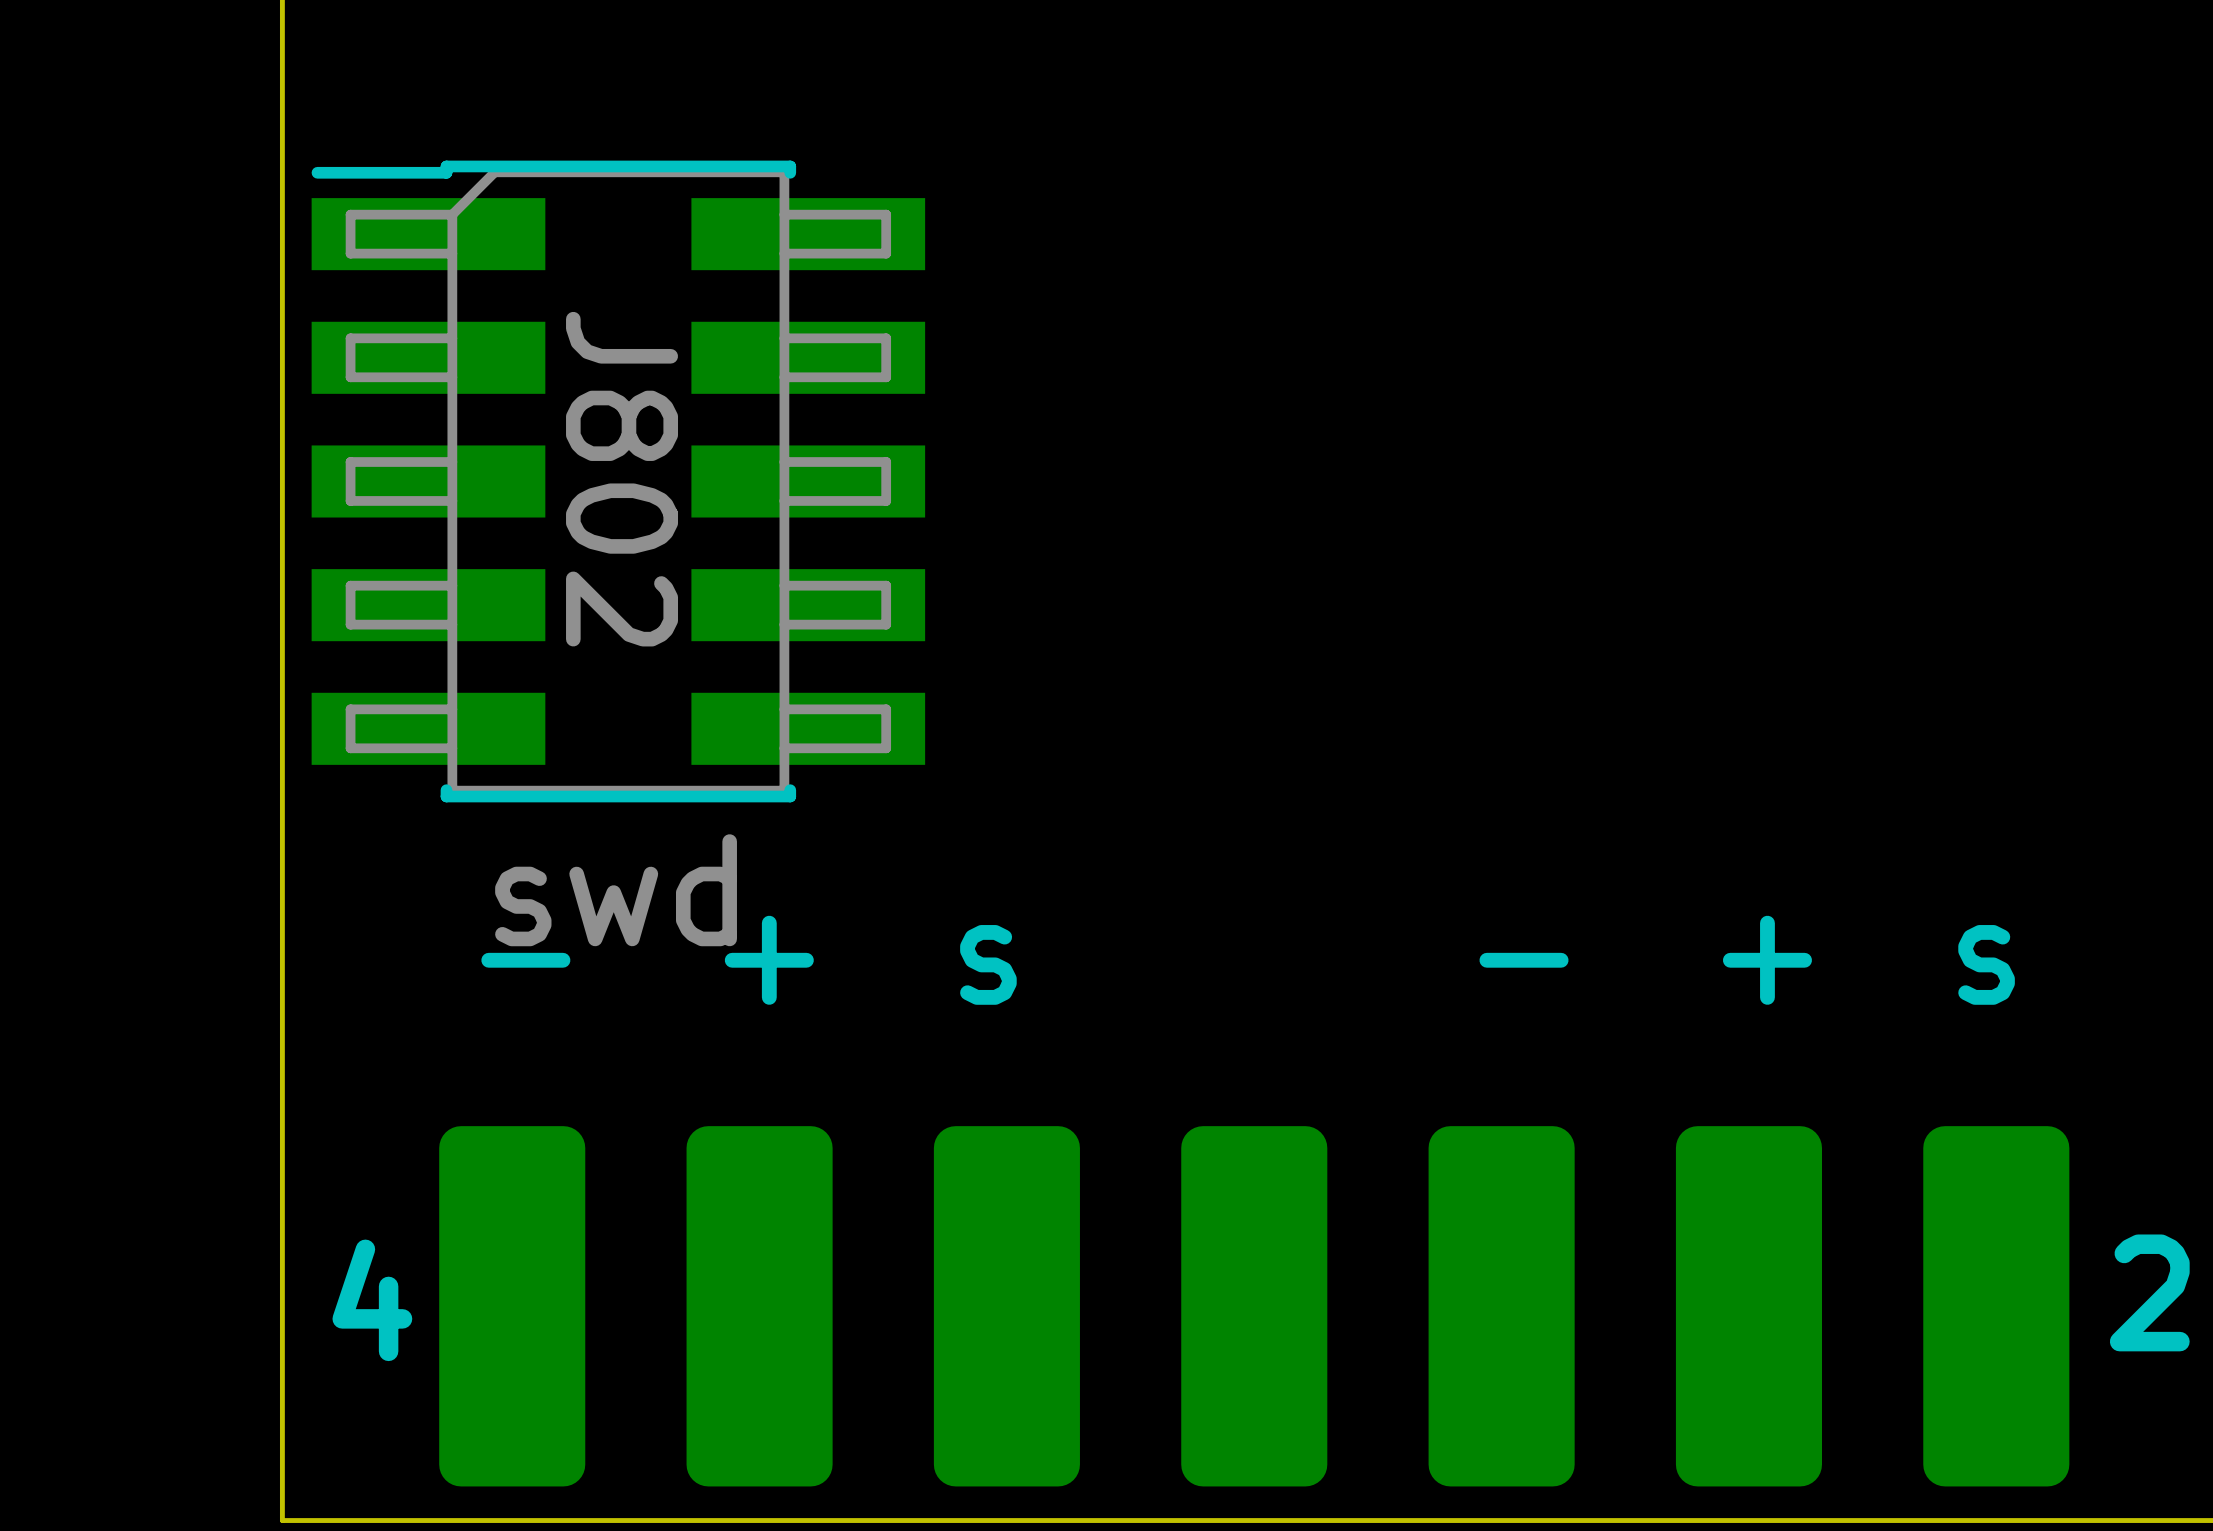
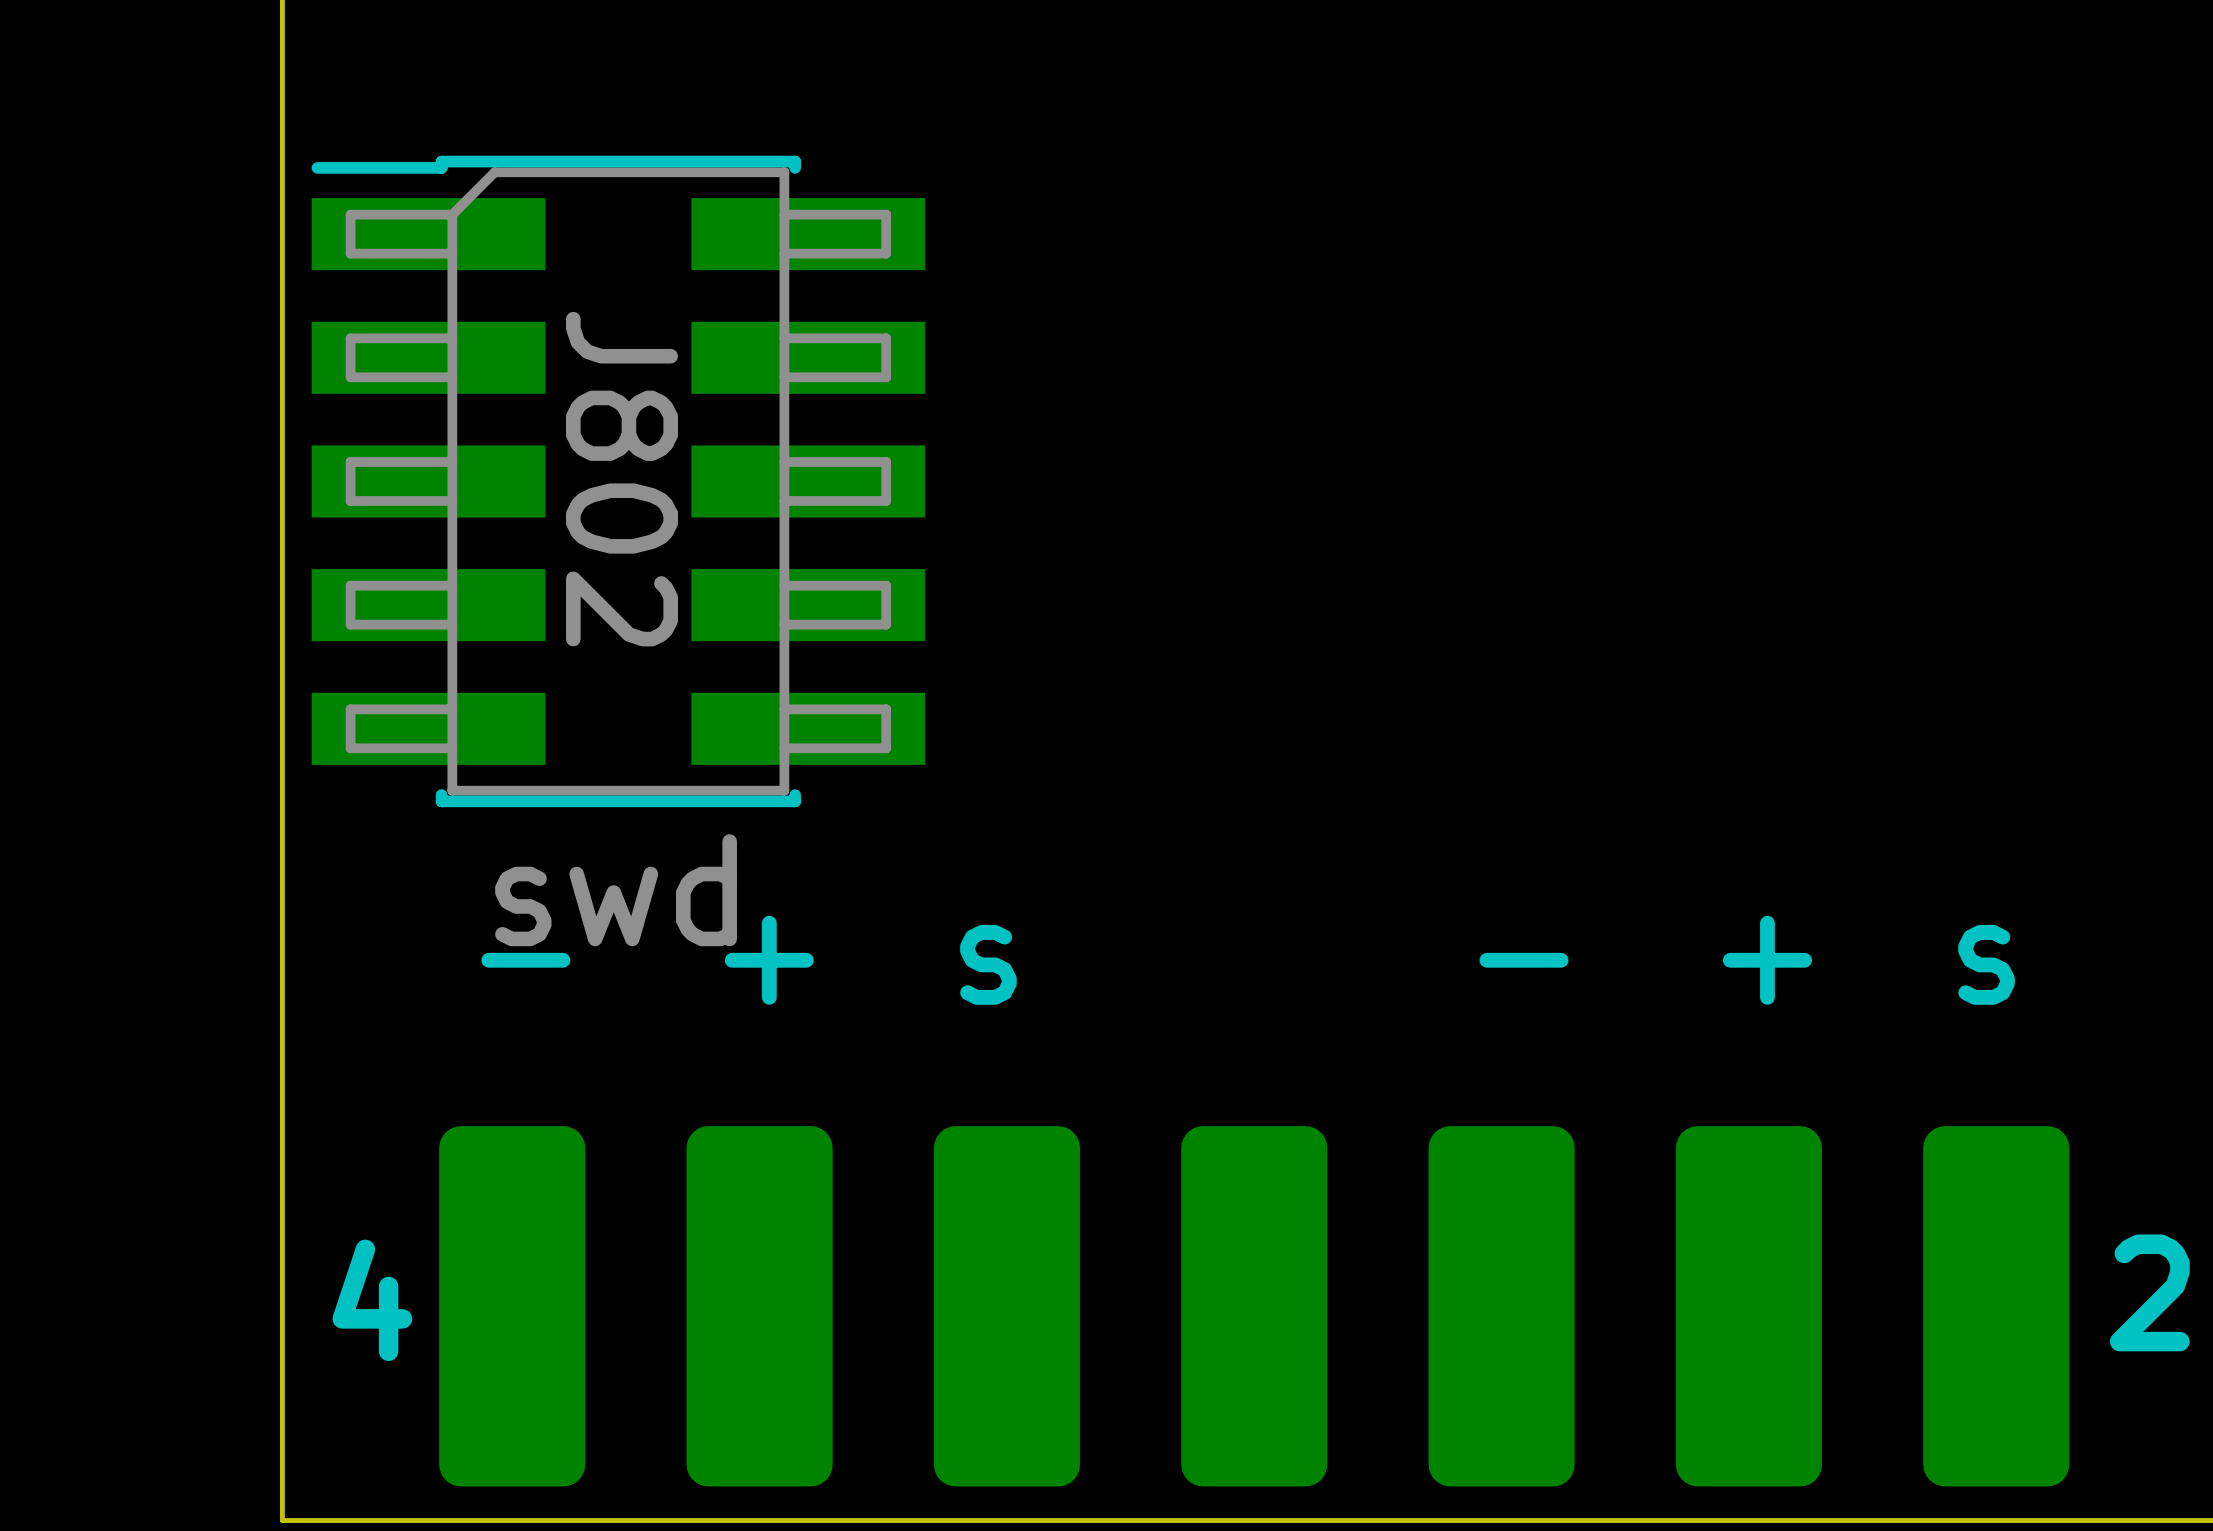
J802 footprint: [311, 160, 926, 803] -> [311, 155, 926, 808]

